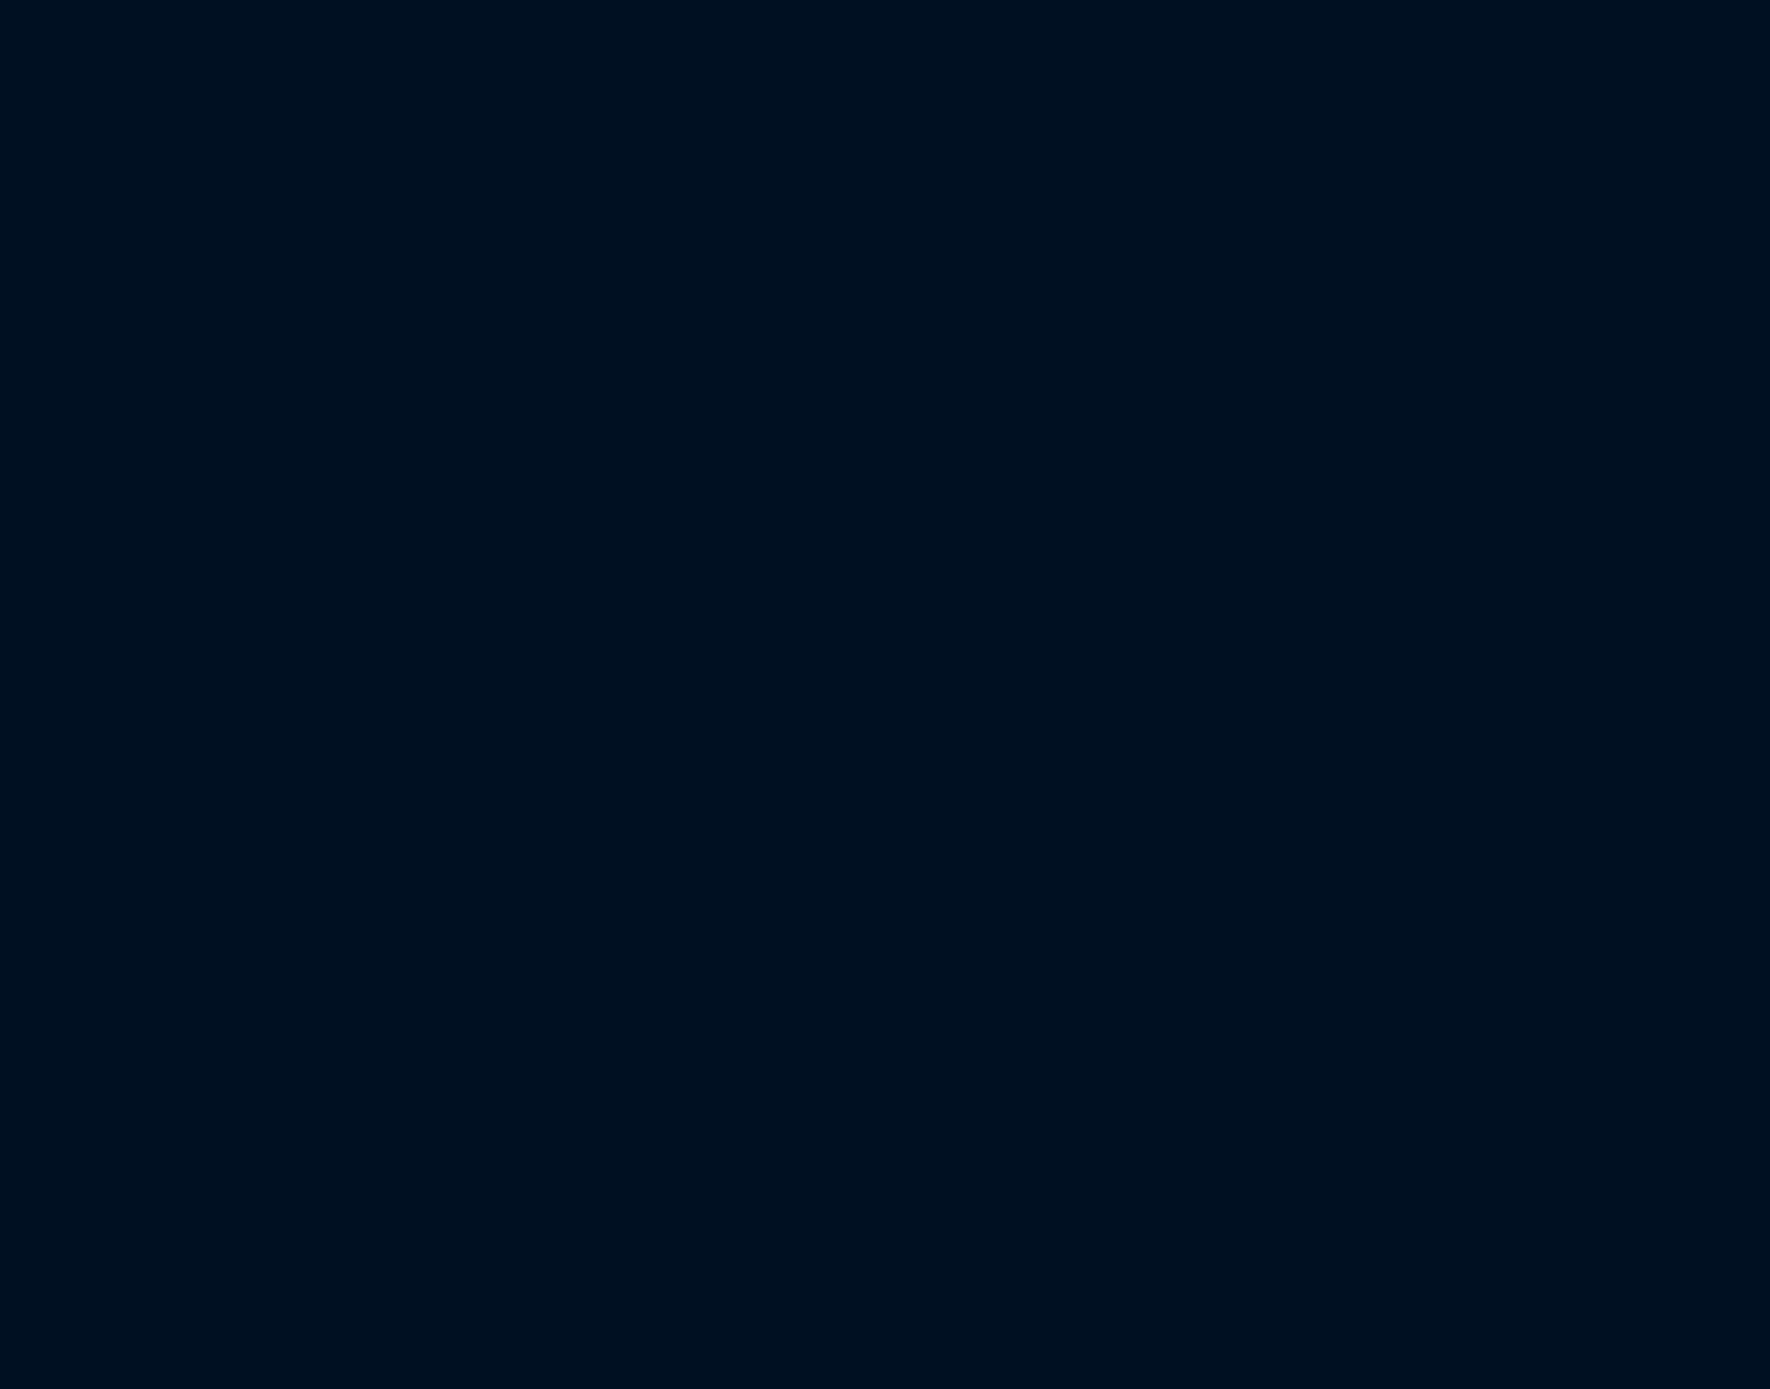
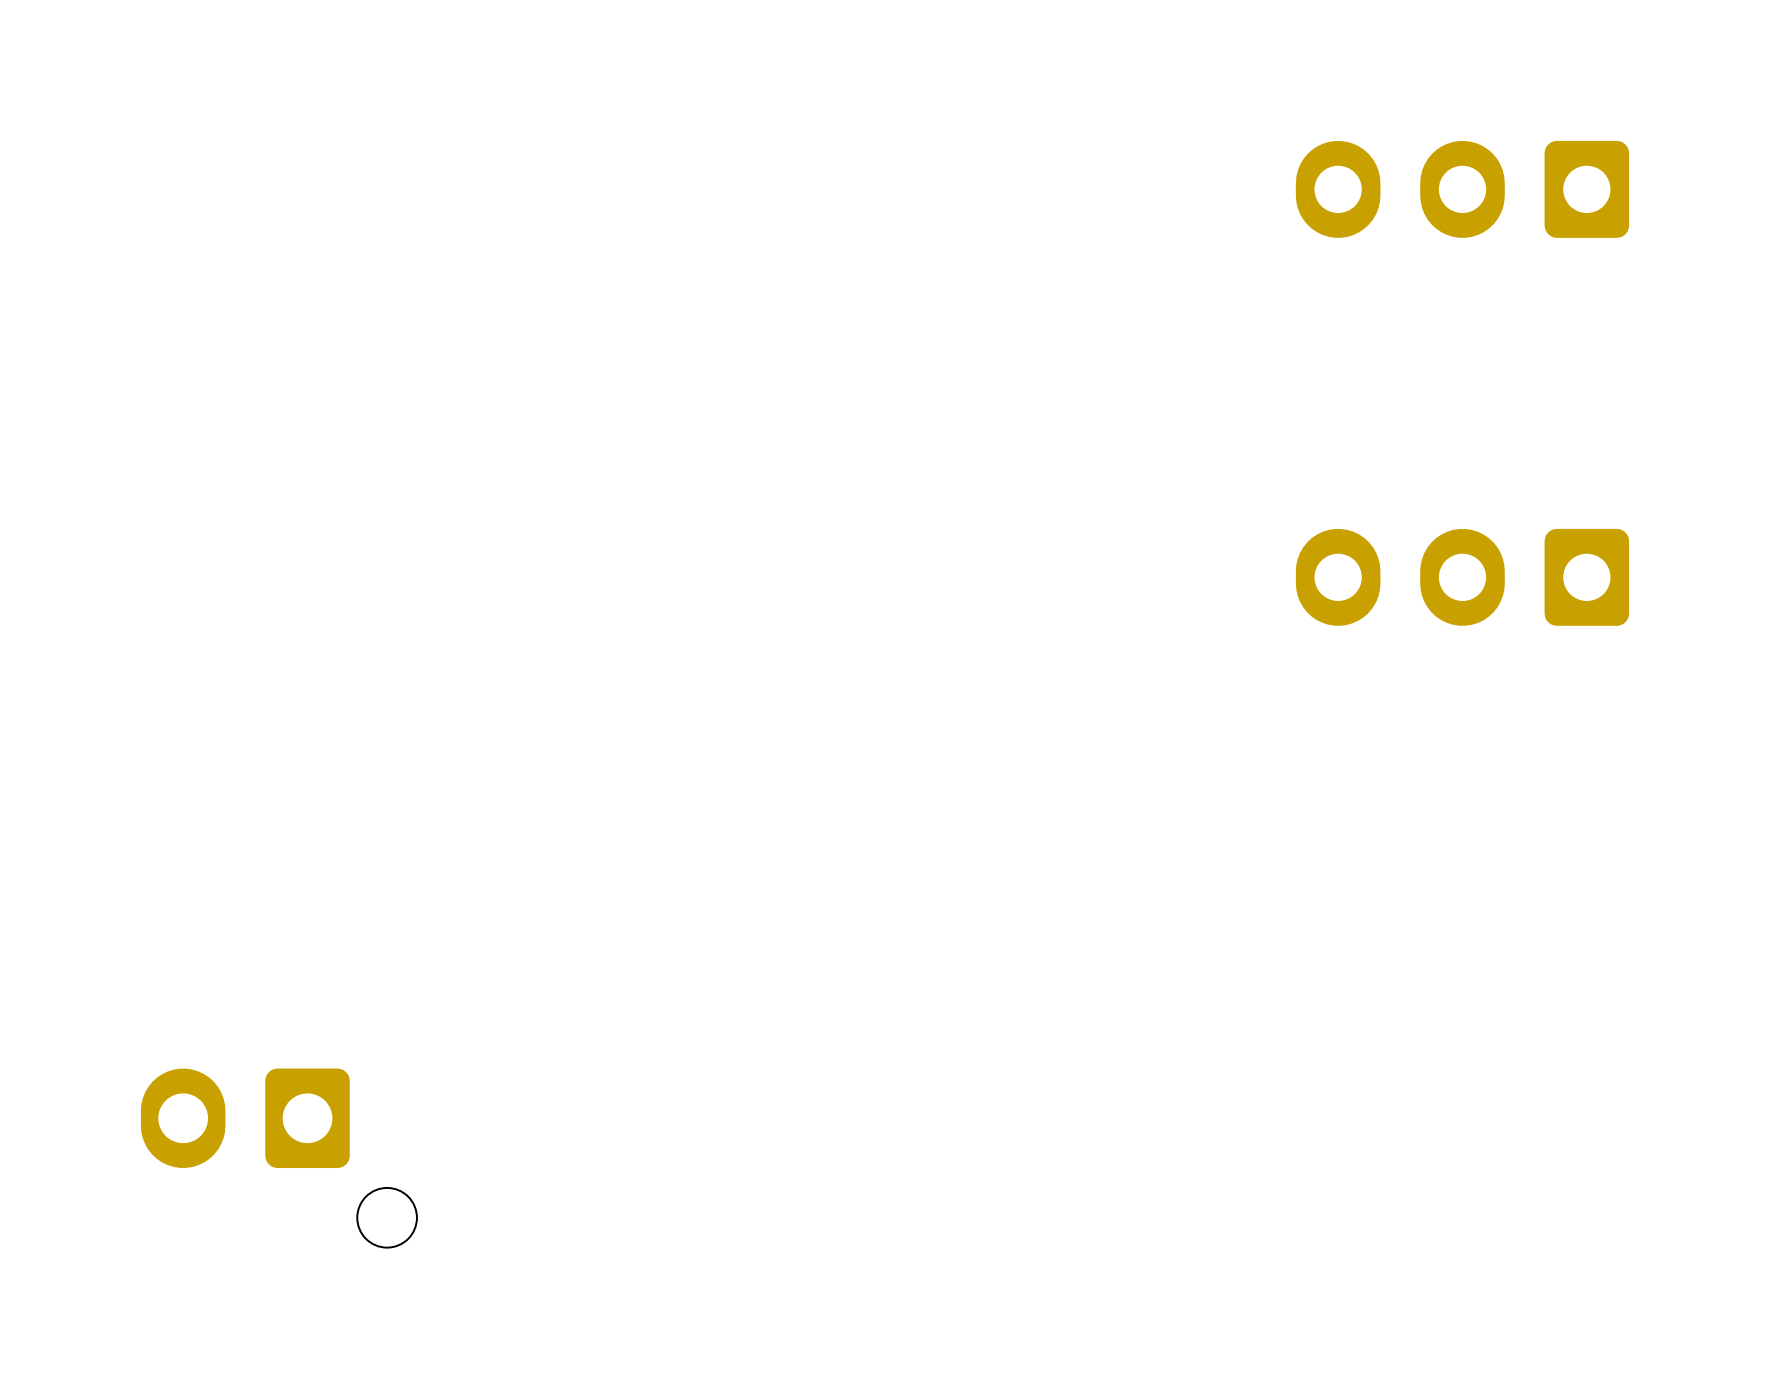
part: none -> (1462, 189)
part: none -> (1462, 577)
part: none -> (278, 1158)

